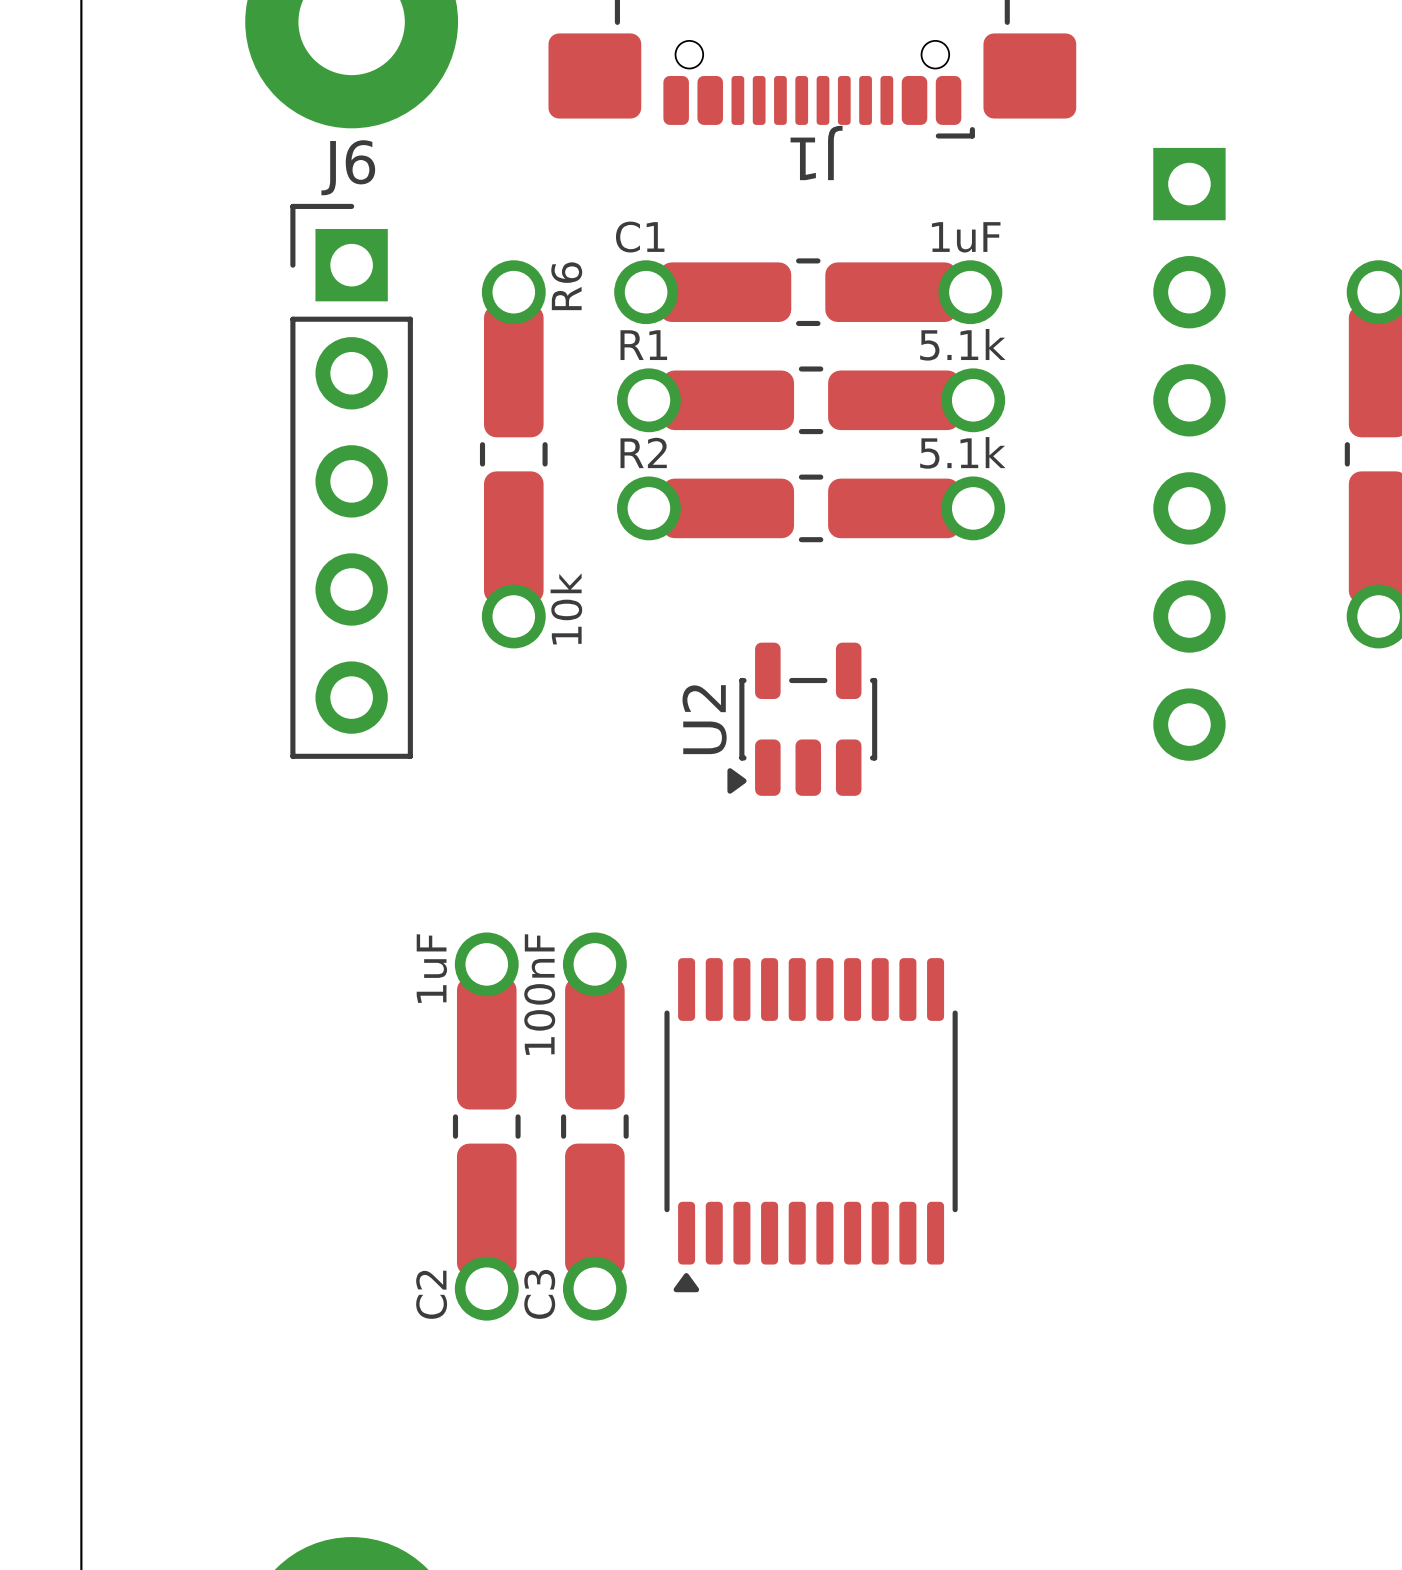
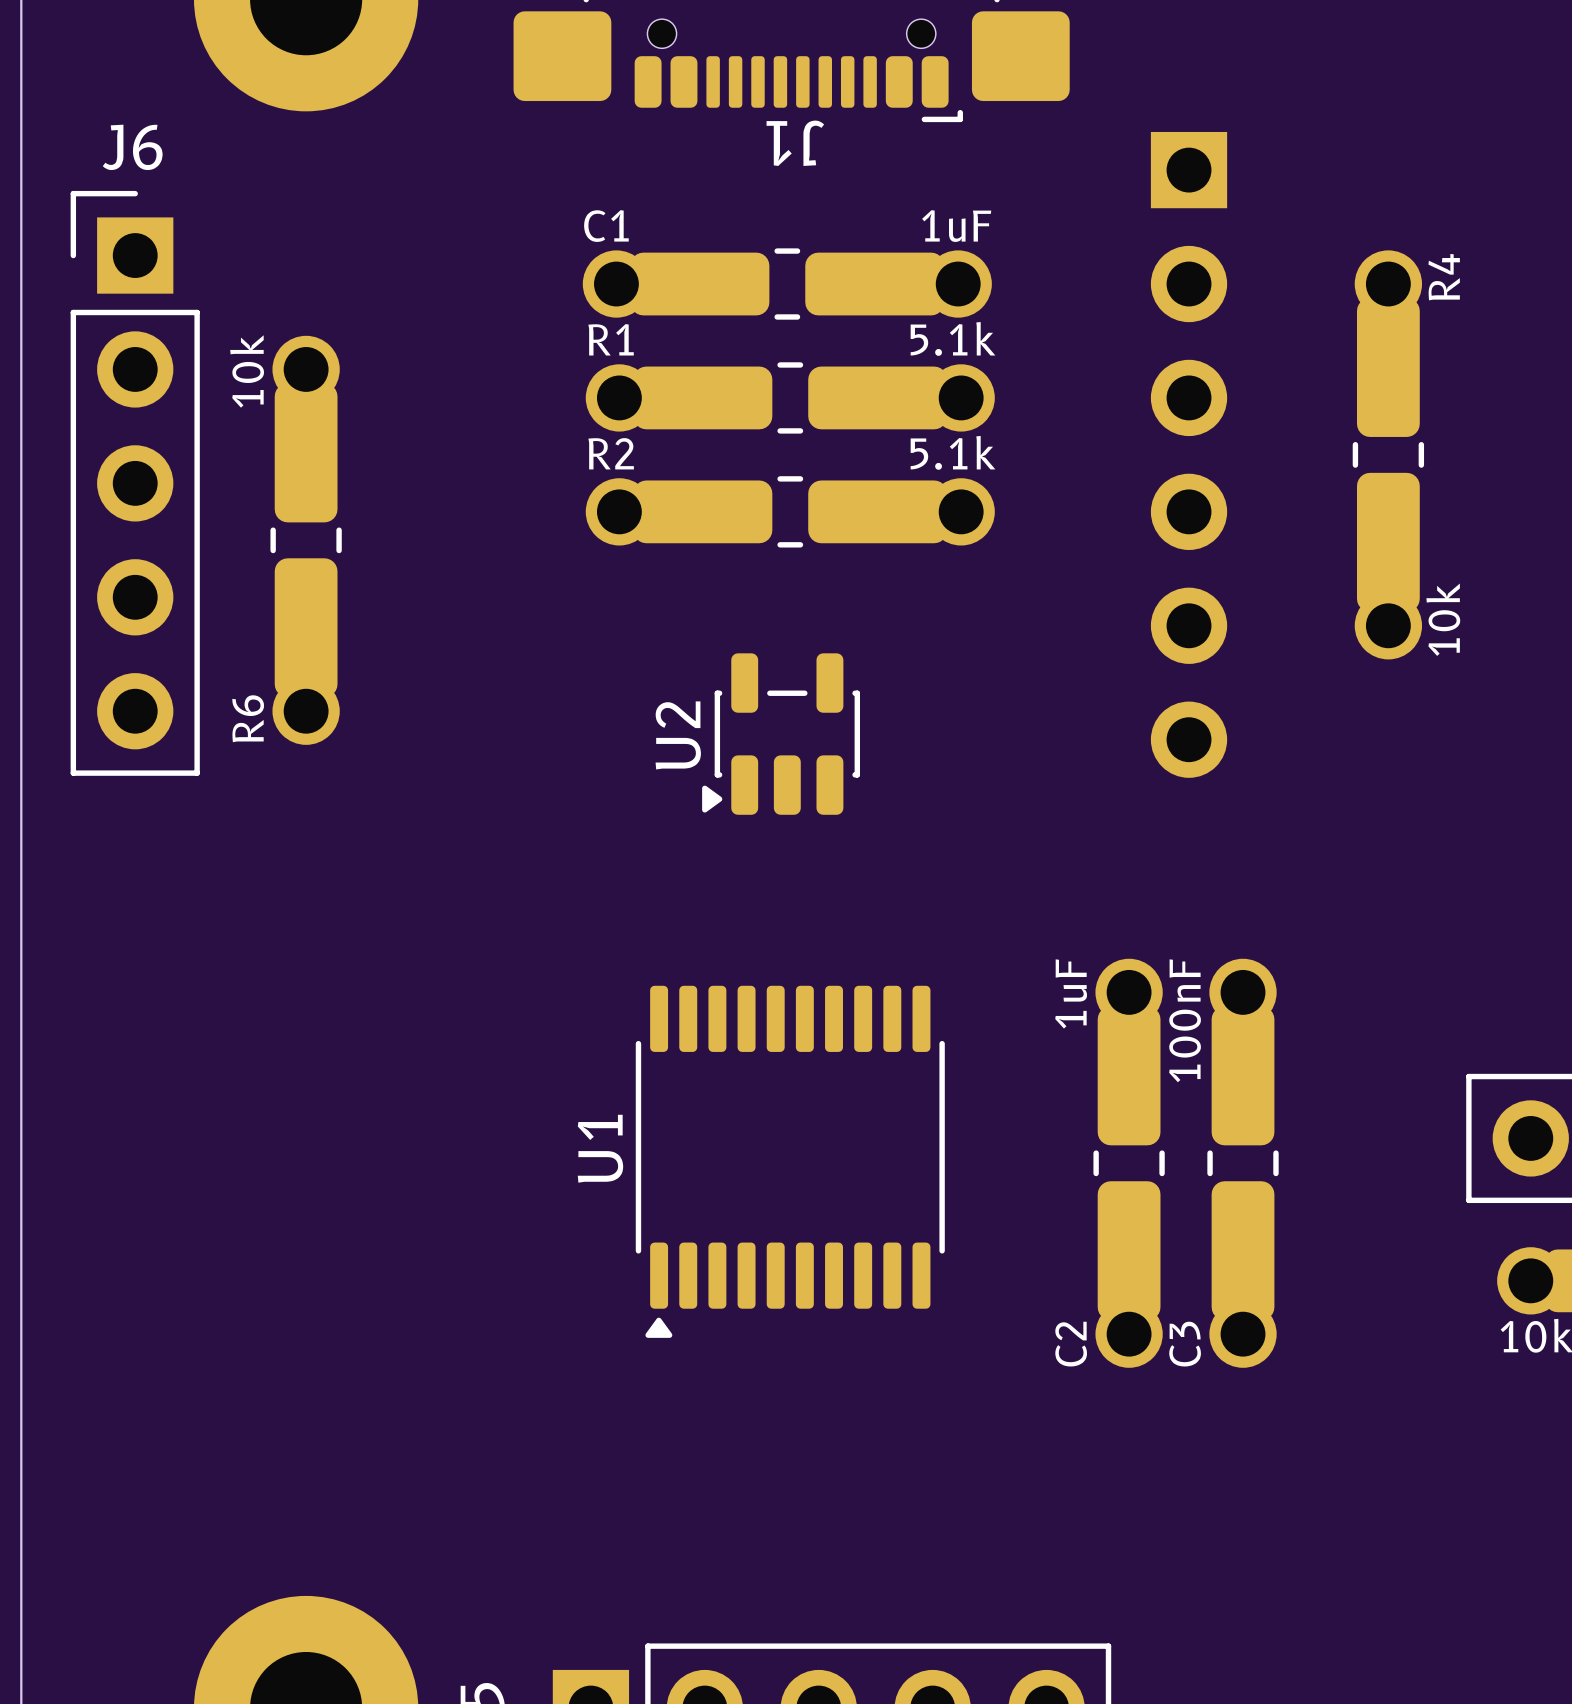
R6 name position: R6 (566, 286) -> R6 (248, 718)
R6 position: (513, 454) -> (306, 540)
J6 position: (351, 481) -> (135, 483)
R6 value position: 10k (566, 608) -> 10k (247, 371)
U1 name: none -> U1 (600, 1148)
C2 position: (486, 1126) -> (1129, 1163)
C3 position: (594, 1126) -> (1243, 1163)

